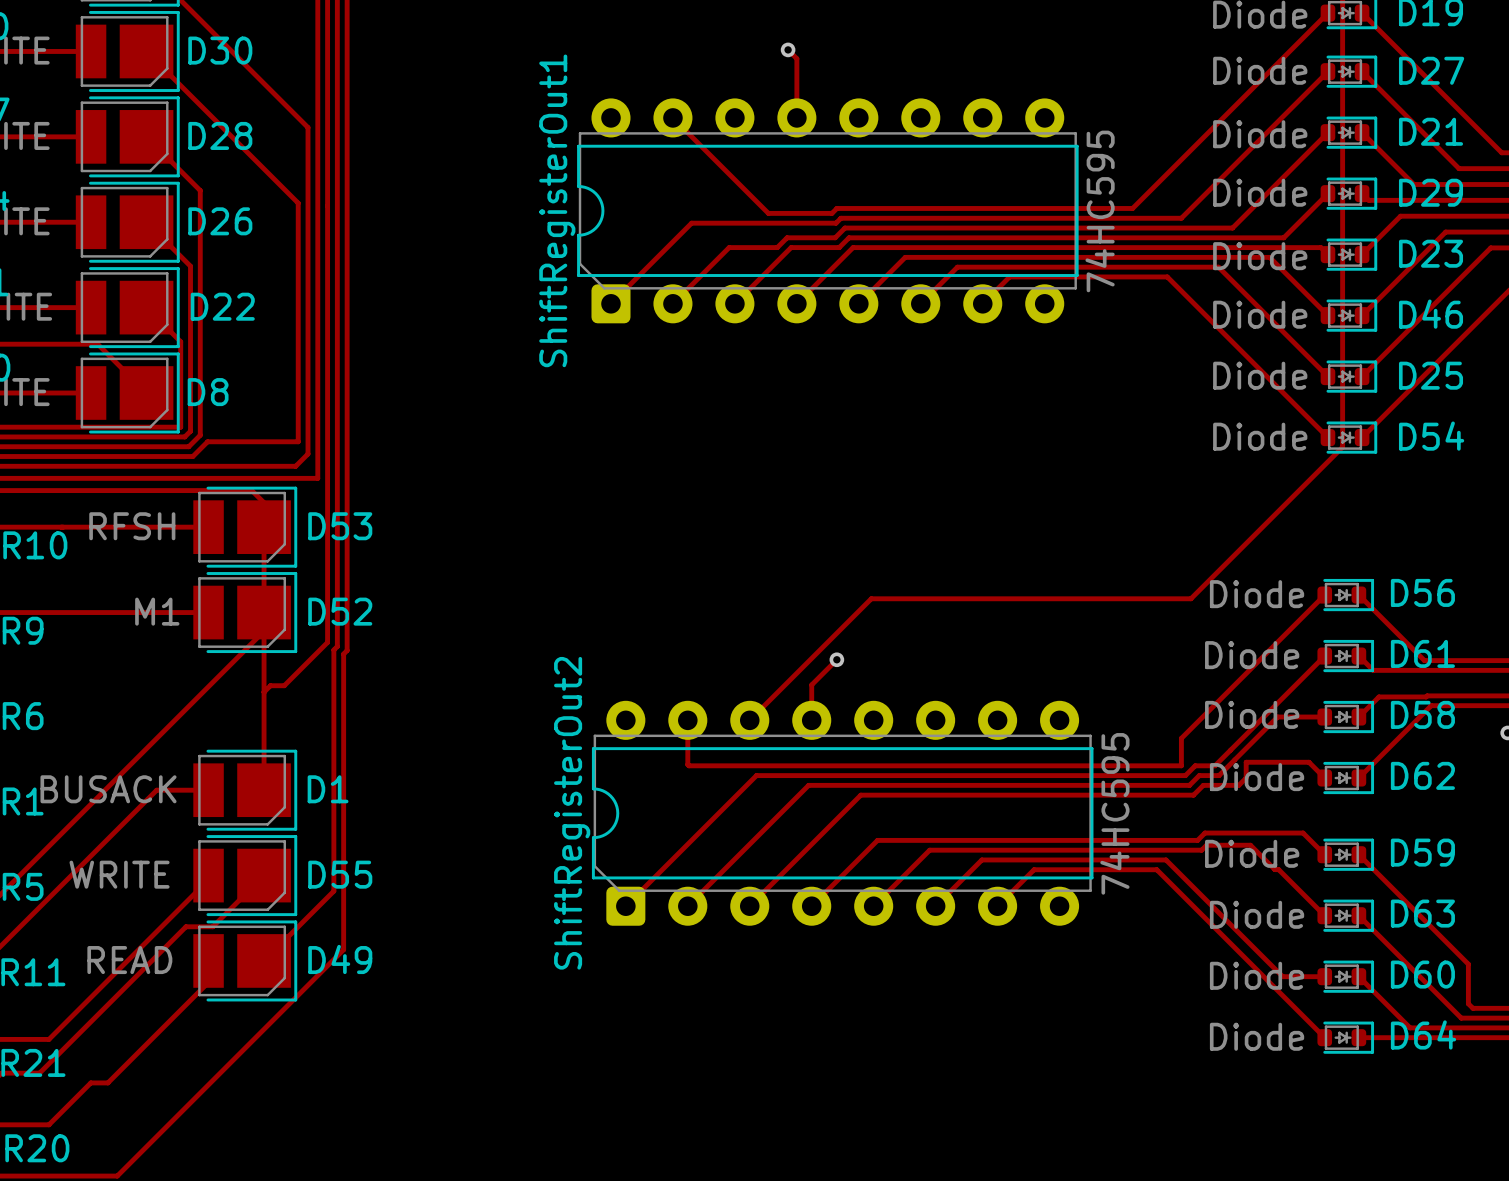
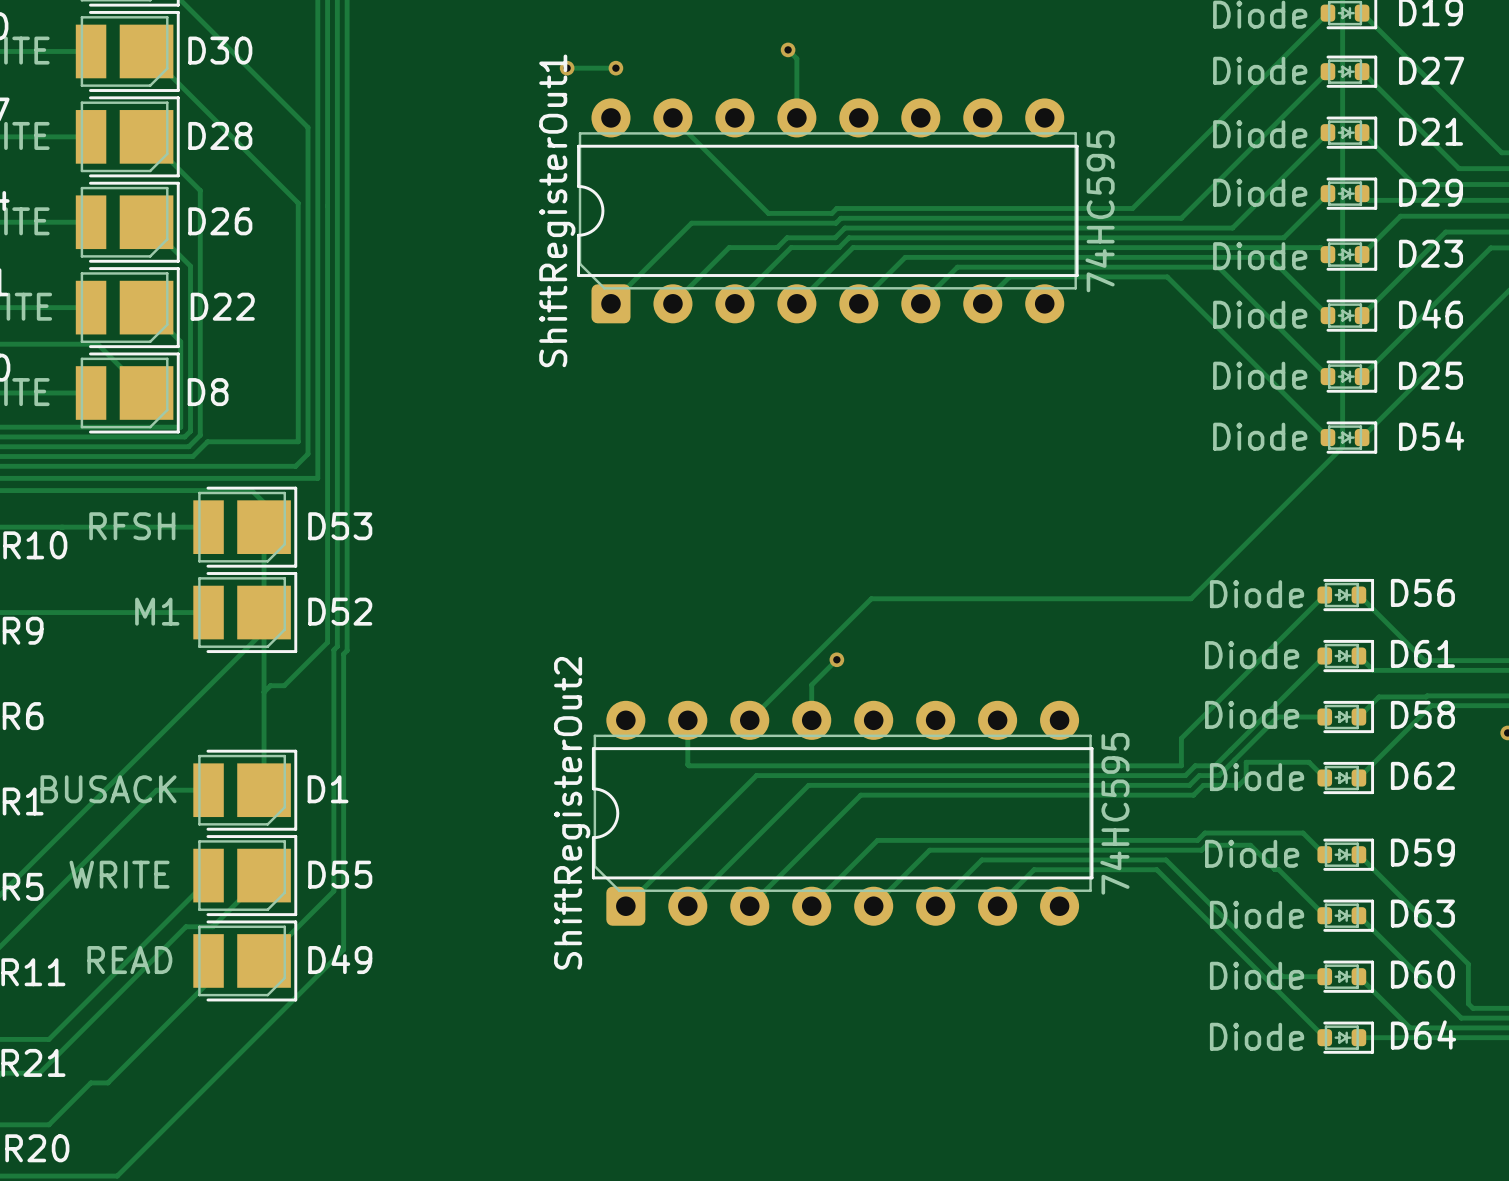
track: none -> (567, 68) (615, 68)
via: none -> (567, 68)
via: none -> (615, 68)

